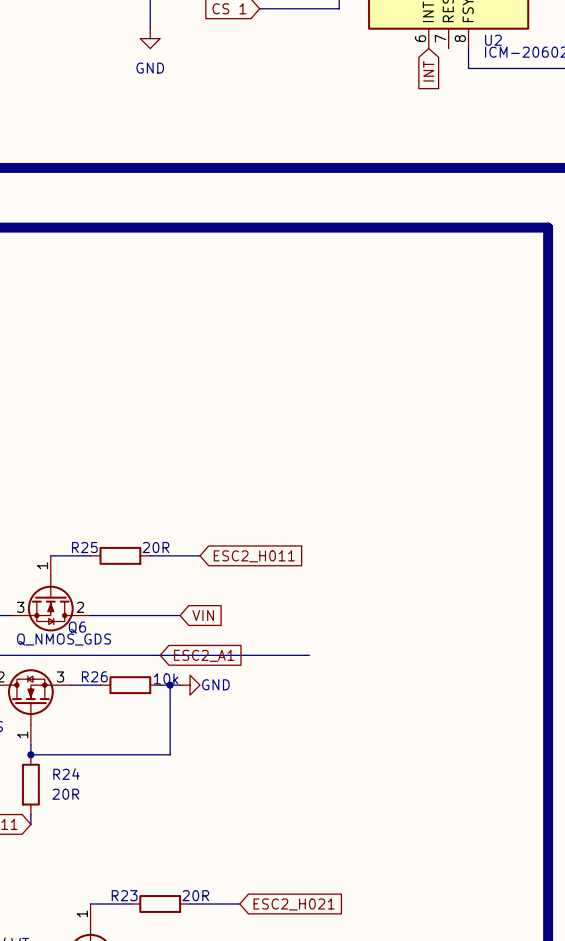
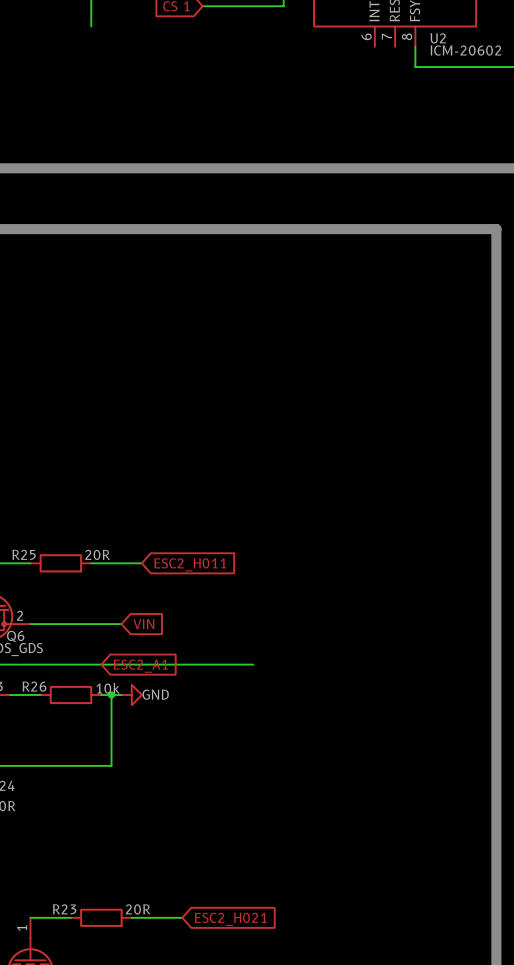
power symbol: GND (150, 38) -> none
global label: INT (428, 71) -> none

